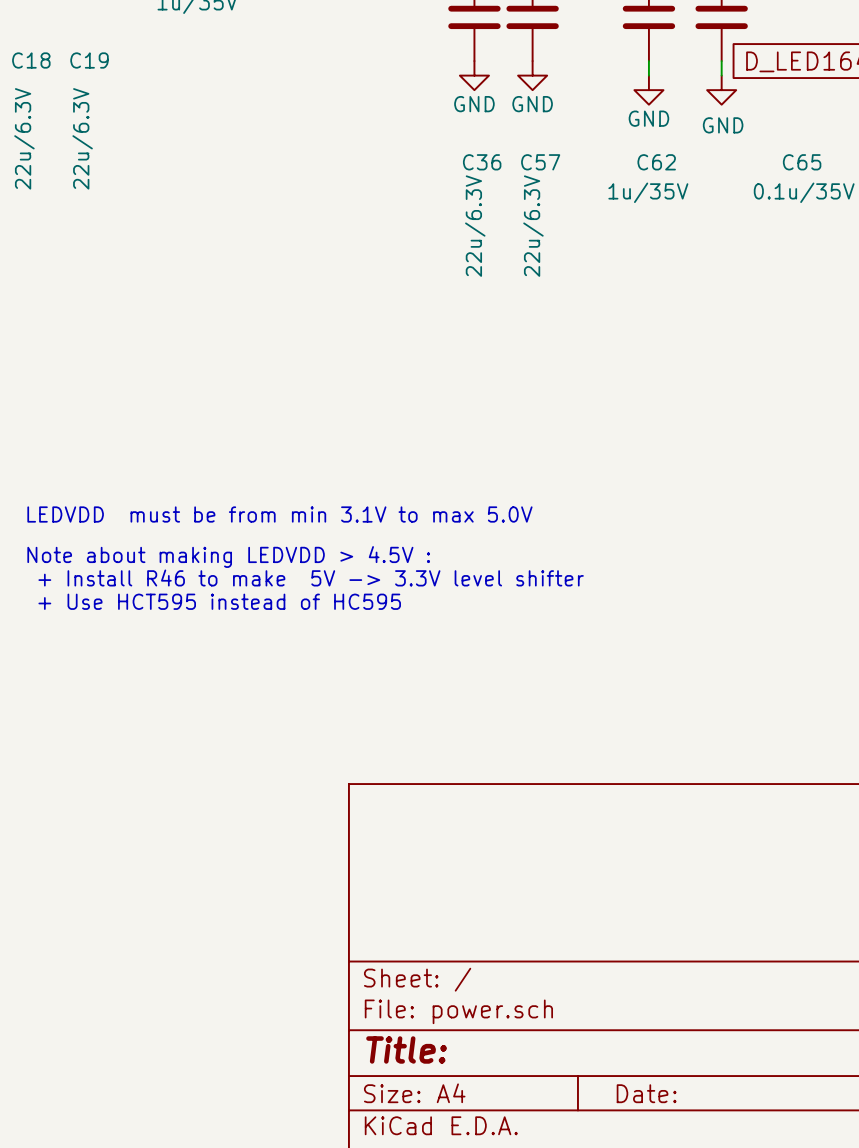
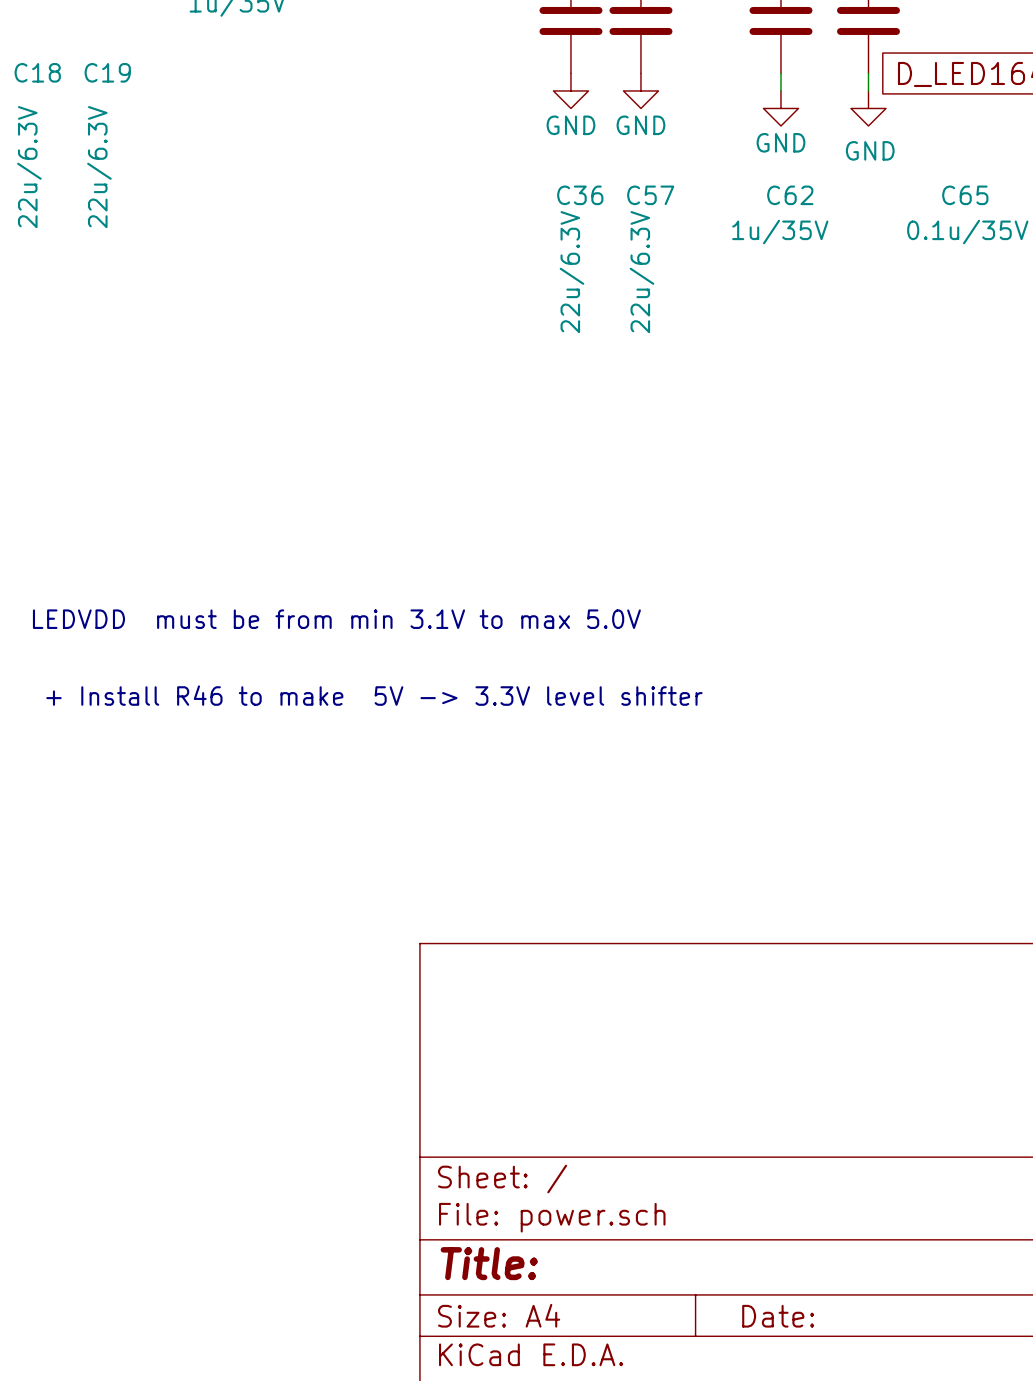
text: Note about making LEDVDD > 4.5V : (228, 557) -> none
text: + Use HCT595 instead of HC595 (219, 601) -> none

